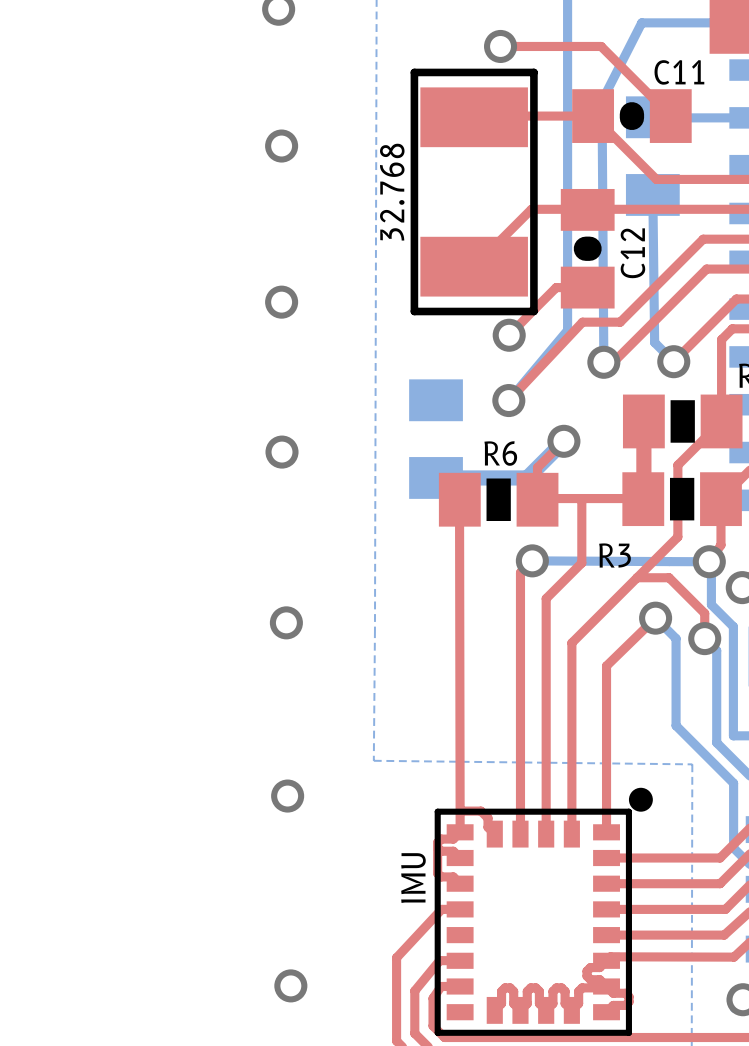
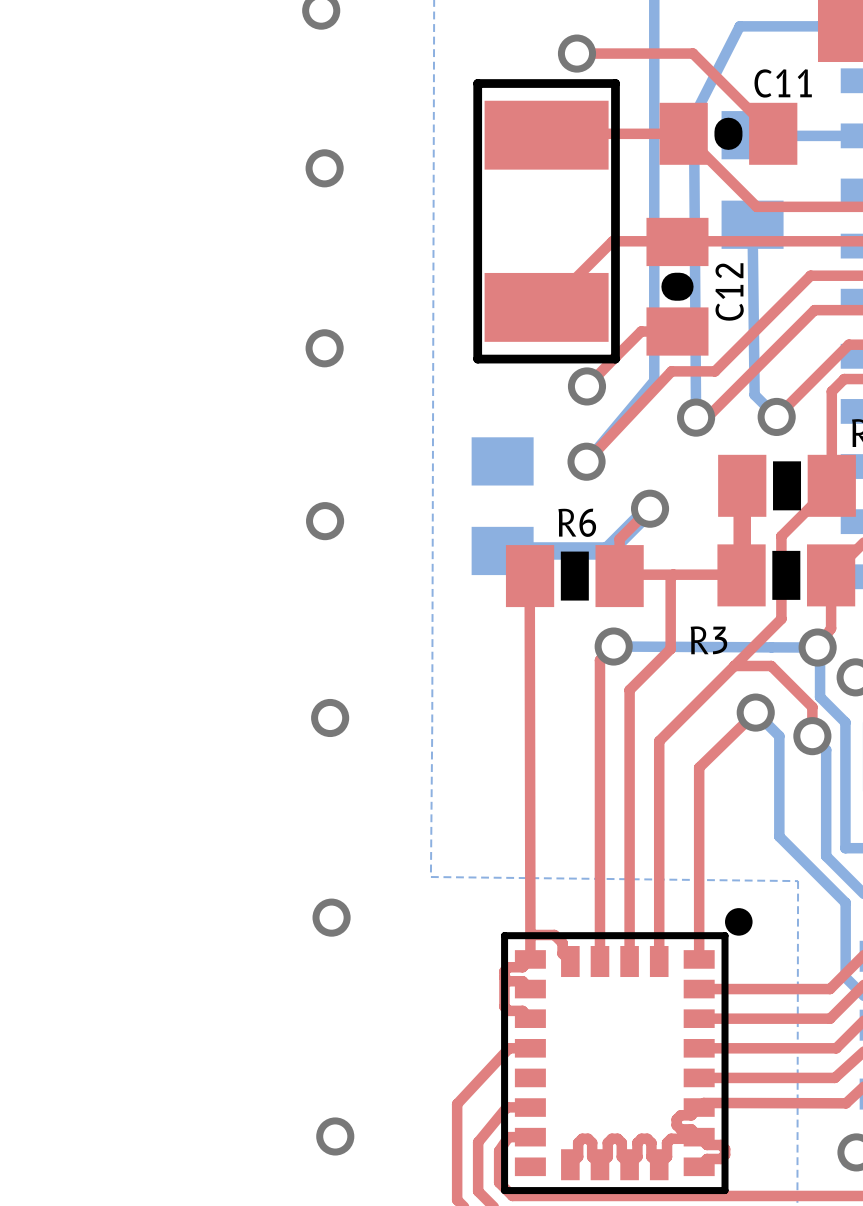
text: 32.768 (392, 192) -> none
text: IMU (413, 878) -> none

